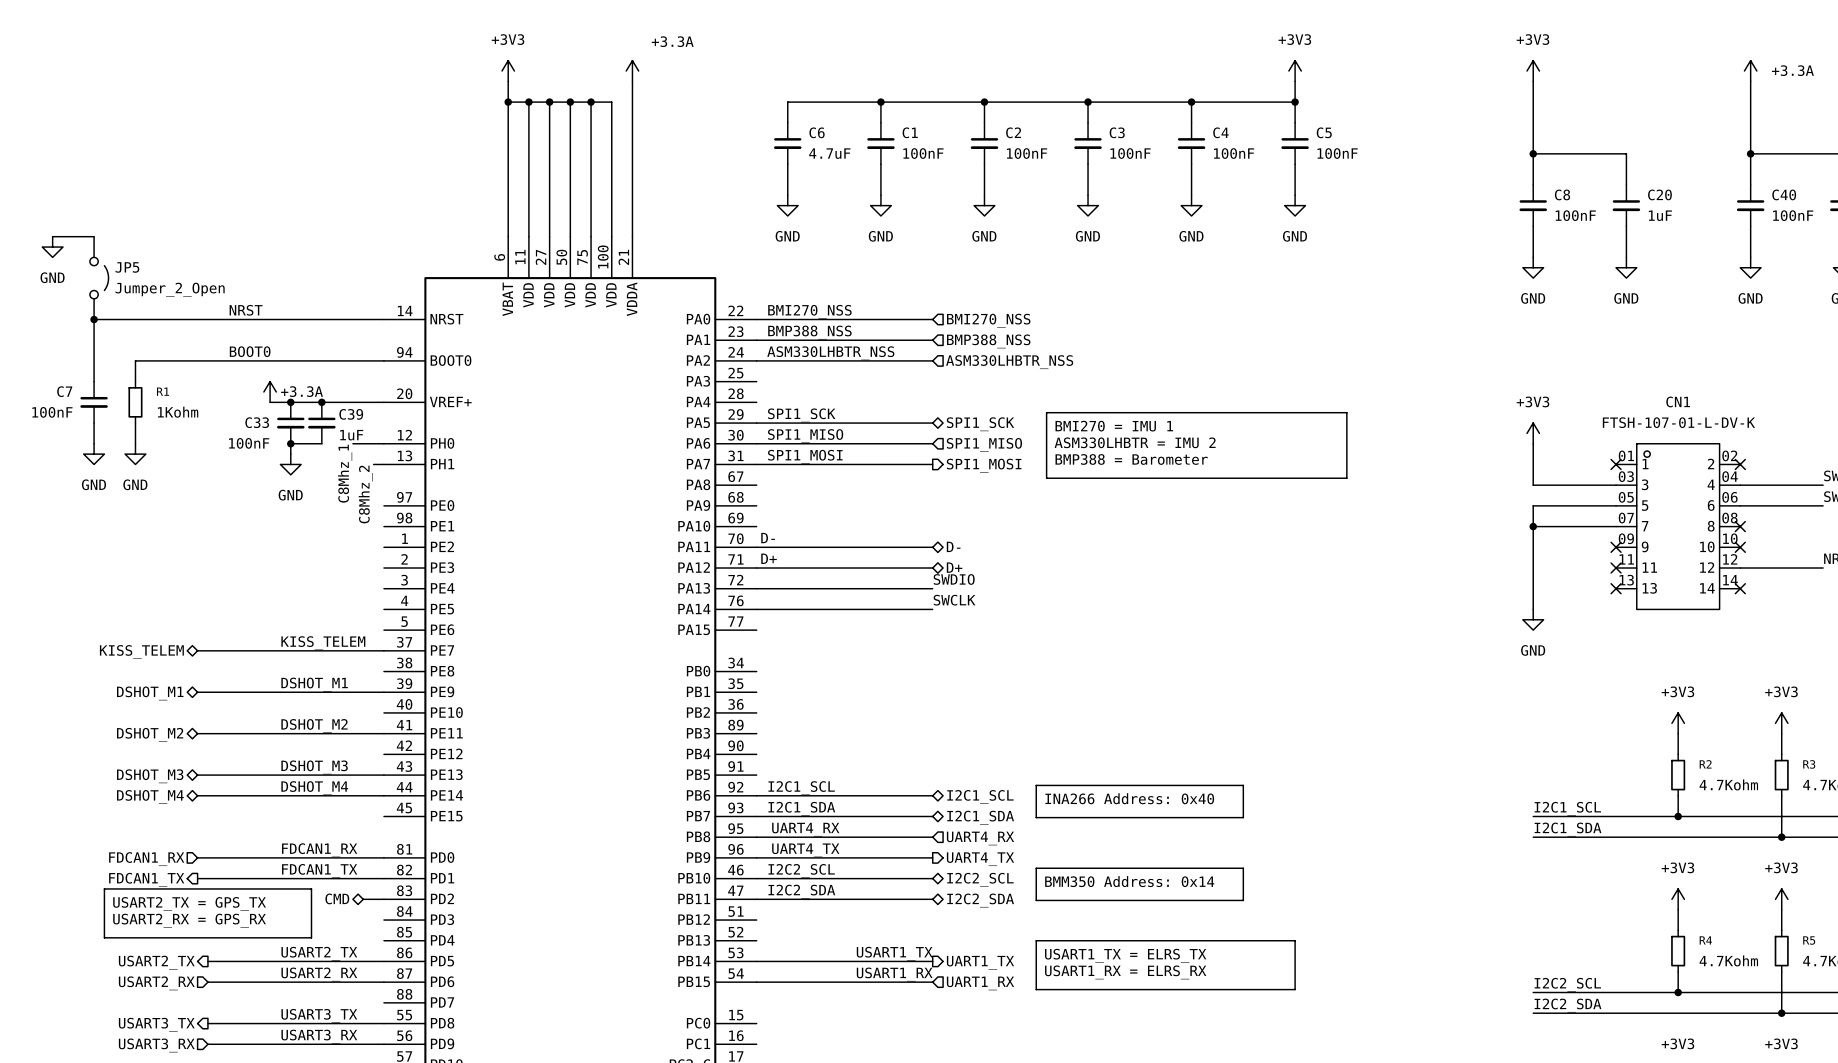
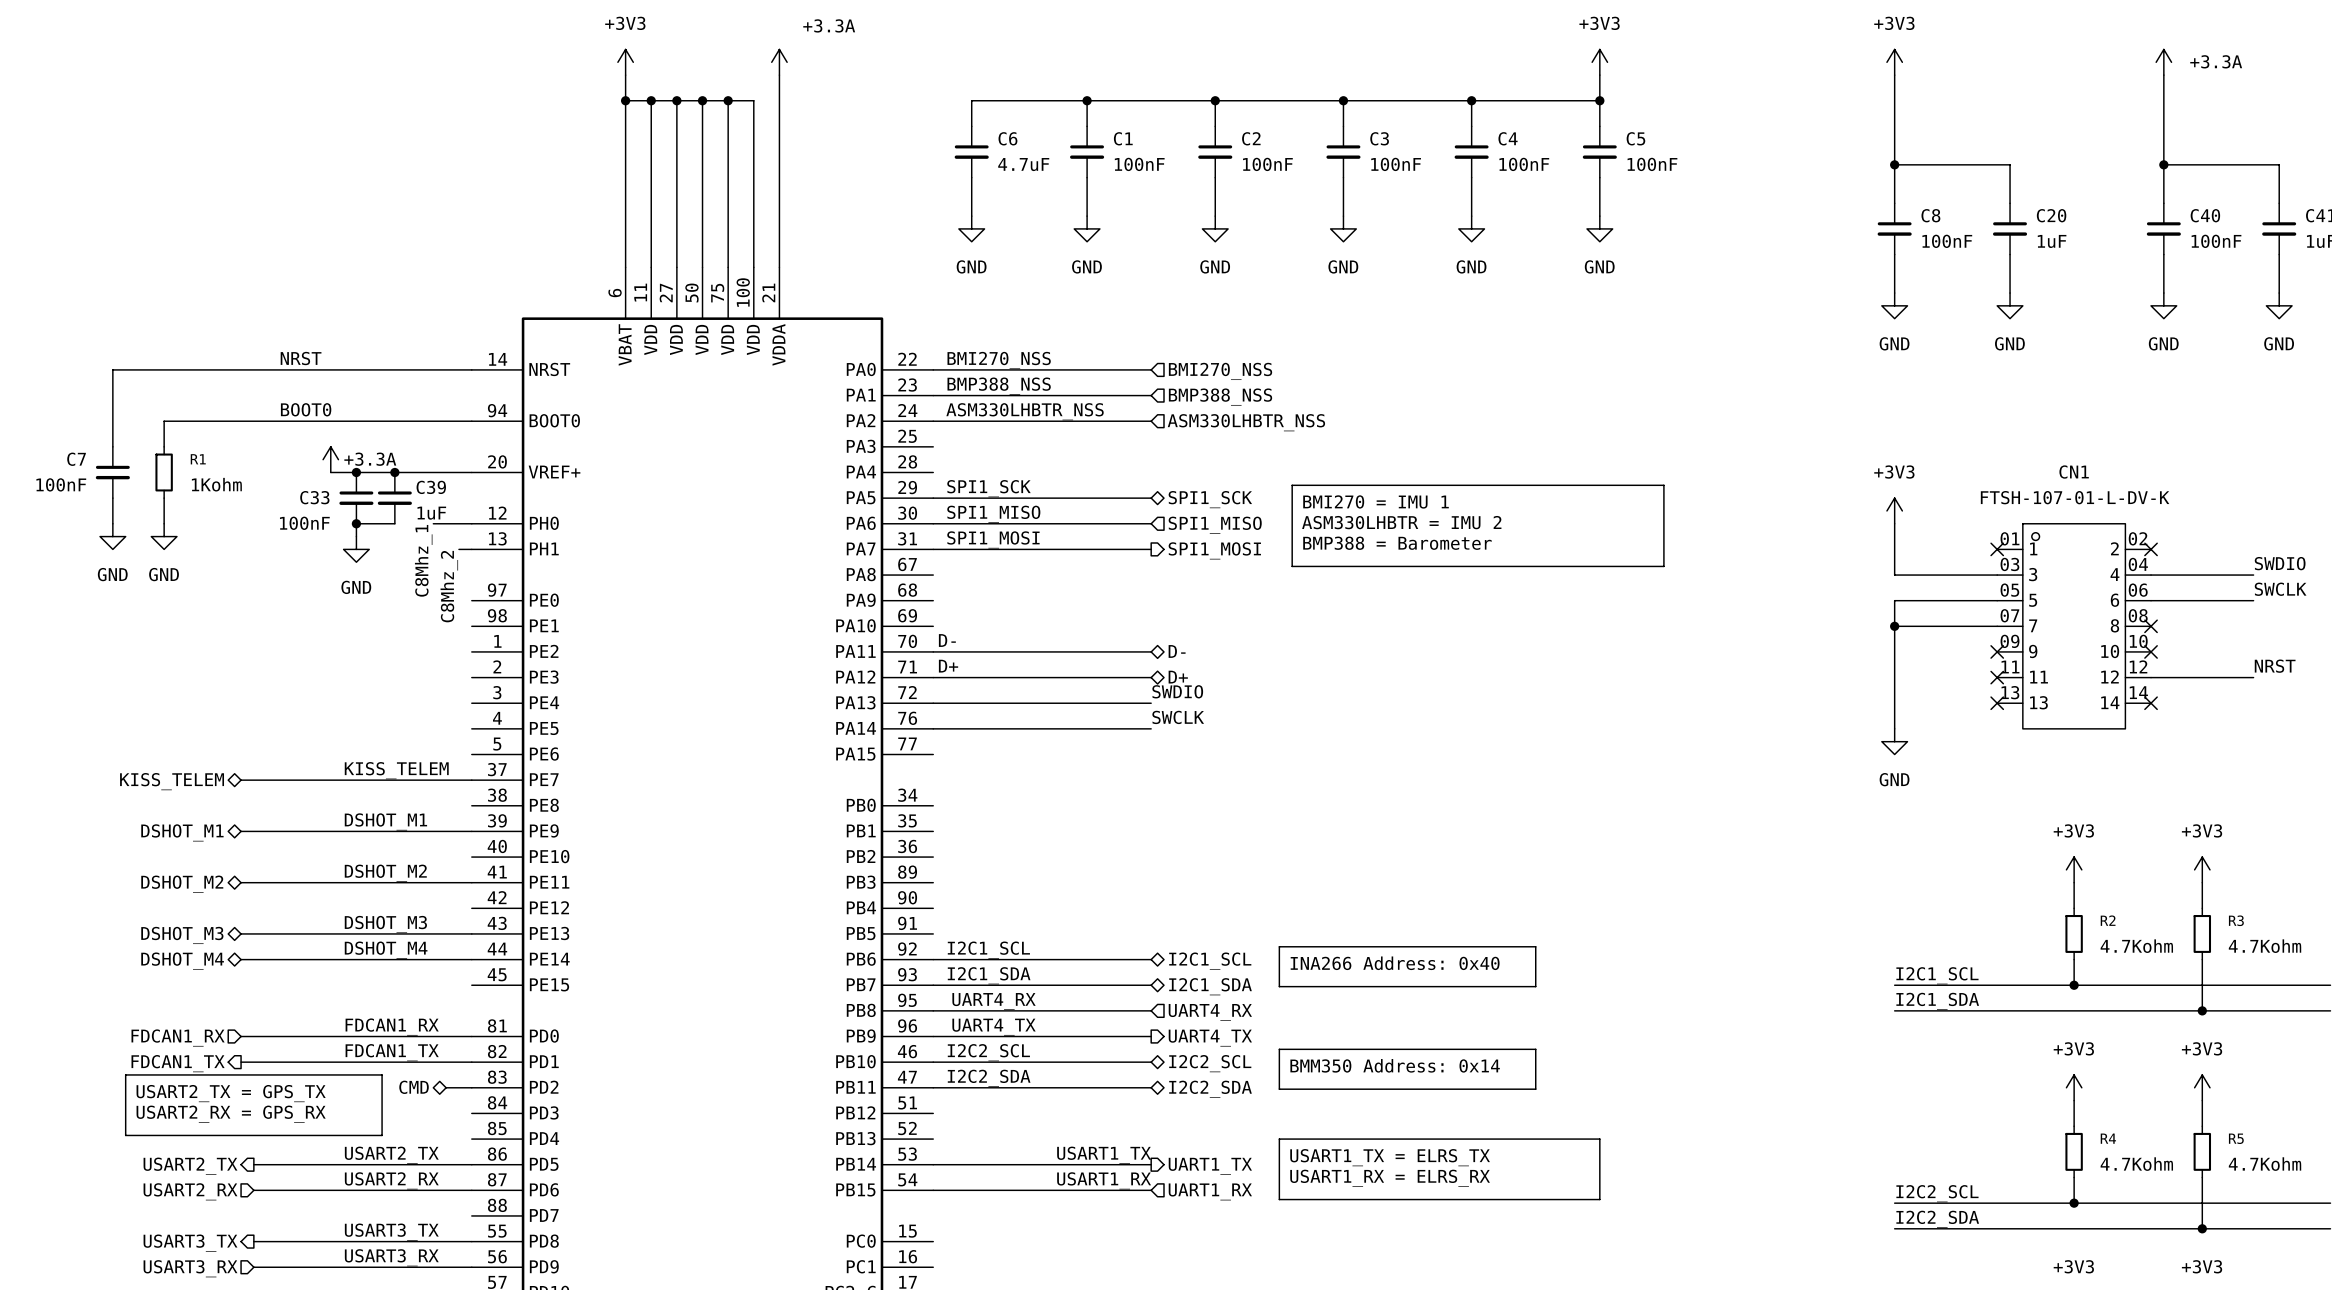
wire: (52, 236) (94, 236) -> none
power symbol: GND (52, 247) -> none
JP5: Jumper_2_Open (99, 278) -> none
junction: (94, 319) -> none

